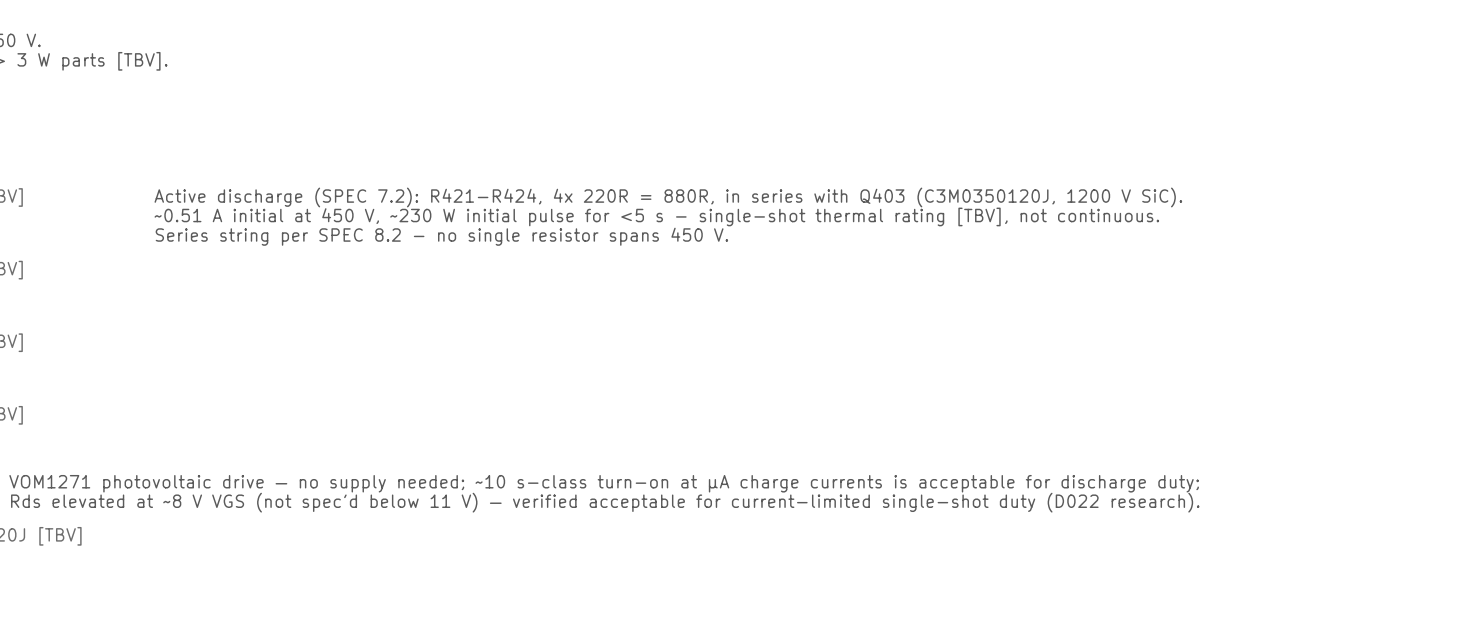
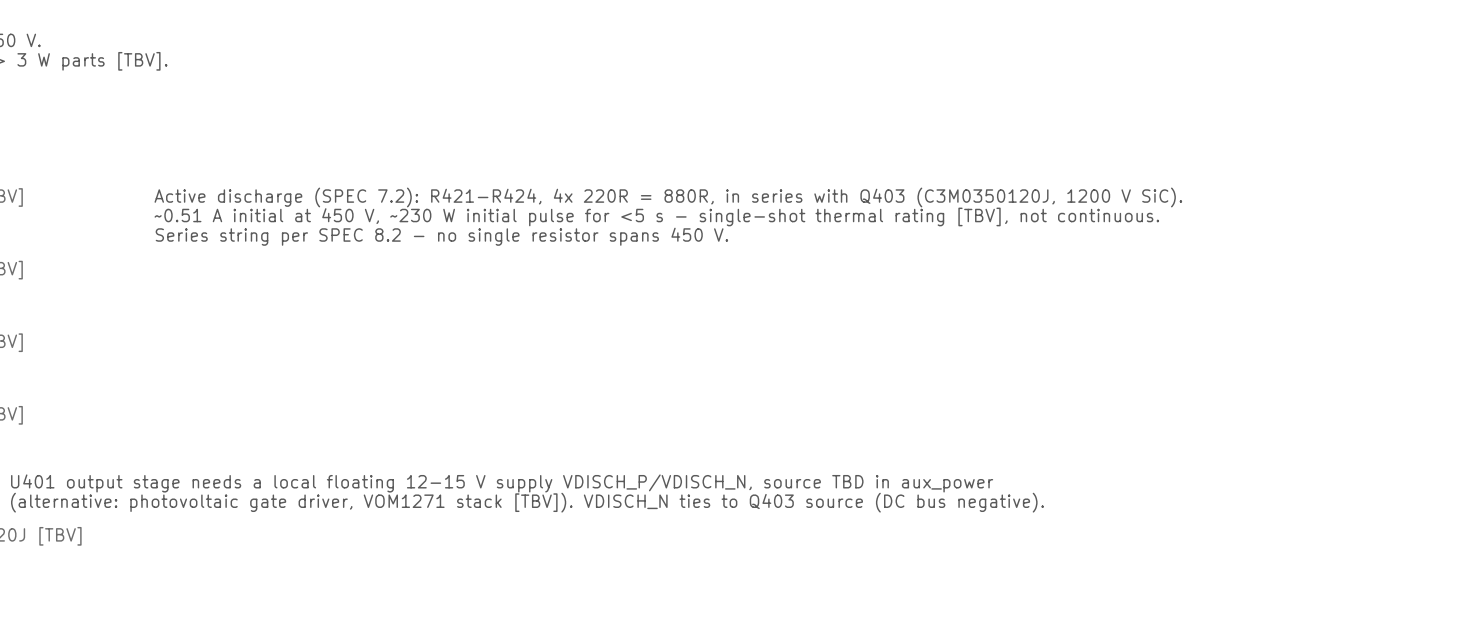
text: VOM1271 photovoltaic drive — no supply needed; ~10 s-class turn-on at µA charge currents is acceptable for discharge duty; (604, 483) -> U401 output stage needs a local floating 12-15 V supply VDISCH_P/VDISCH_N, source TBD in aux_power (502, 483)
text: Rds elevated at ~8 V VGS (not spec'd below 11 V) — verified acceptable for current-limited single-shot duty (D022 research). (605, 502) -> (alternative: photovoltaic gate driver, VOM1271 stack [TBV]). VDISCH_N ties to Q403 source (DC bus negative). (527, 502)

